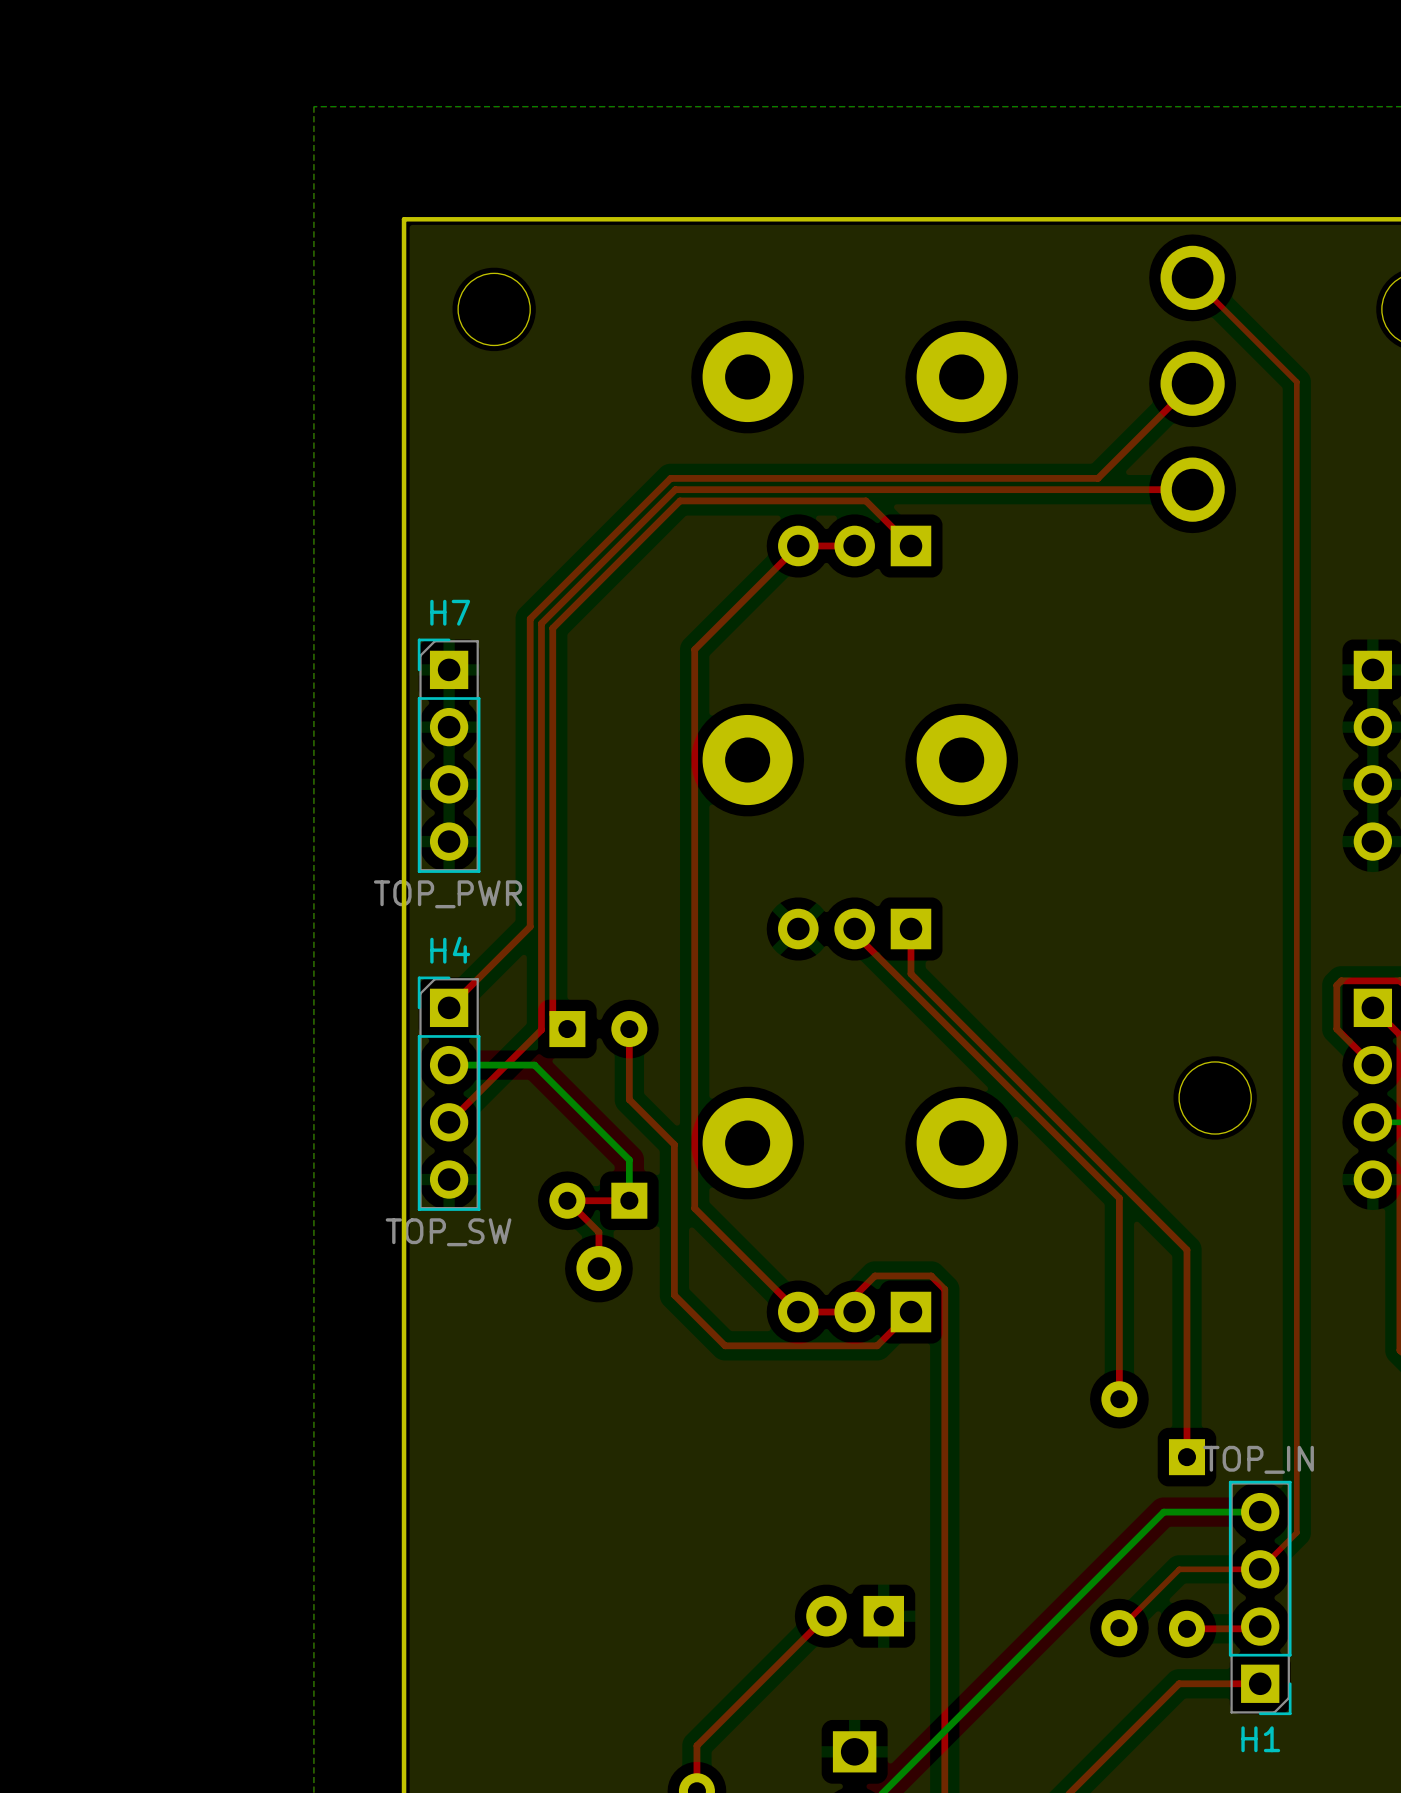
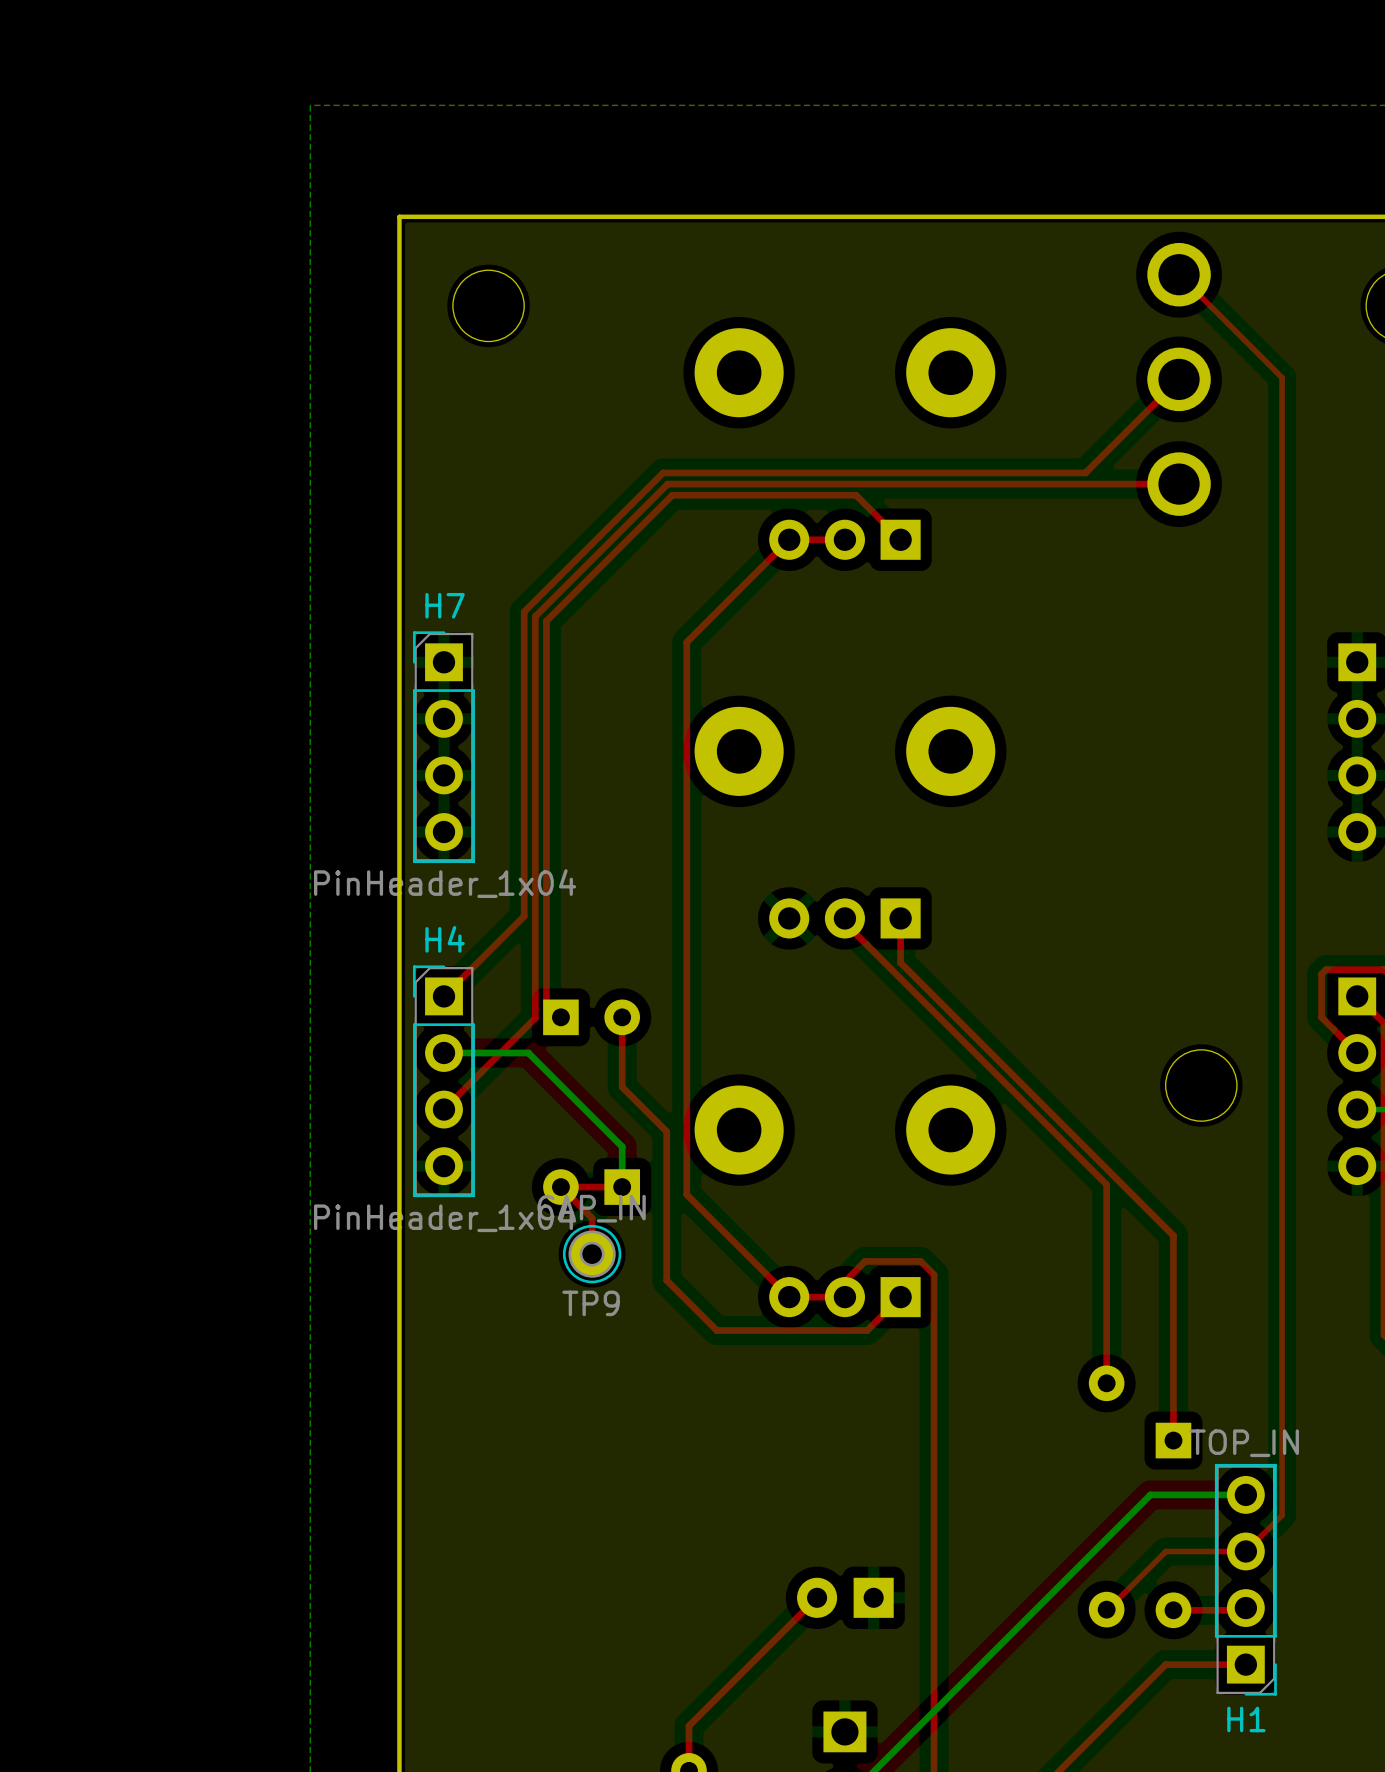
H7 value: TOP_PWR (448, 894) -> PinHeader_1x04 (445, 883)
H4 value: TOP_SW (448, 1232) -> PinHeader_1x04 (445, 1217)
TP9 side: top (598, 1268) -> bottom (592, 1254)

